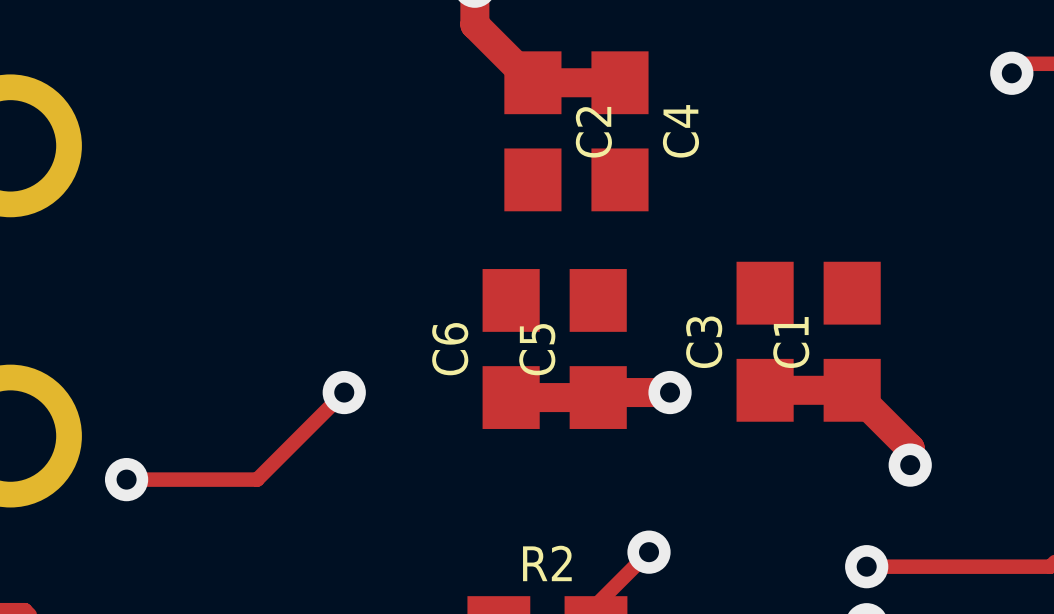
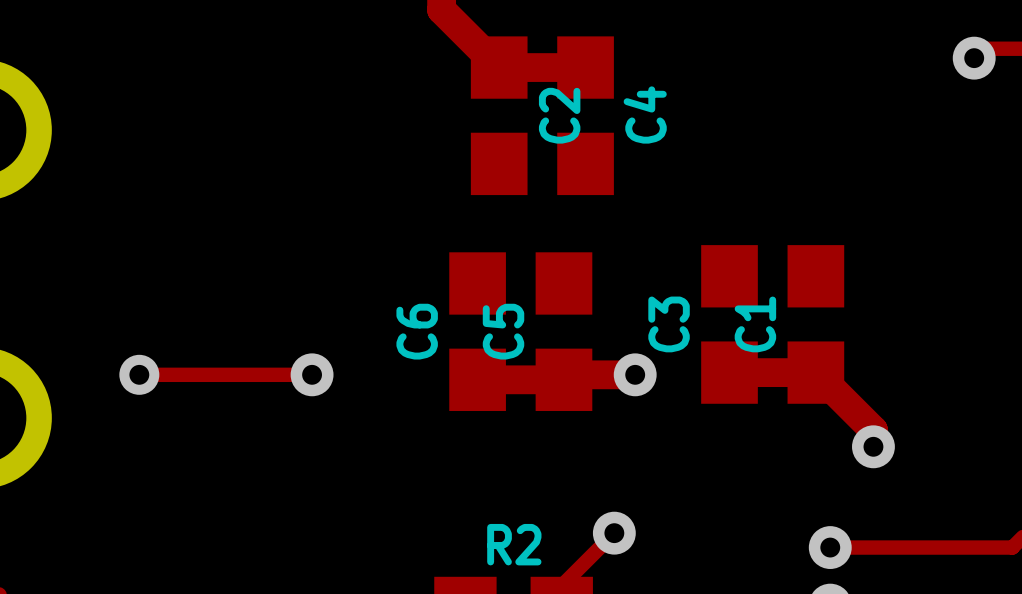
via: none -> (139, 374)
track: (344, 392) (257, 479) (126, 479) -> (312, 374) (139, 374)
via: (126, 479) -> none

